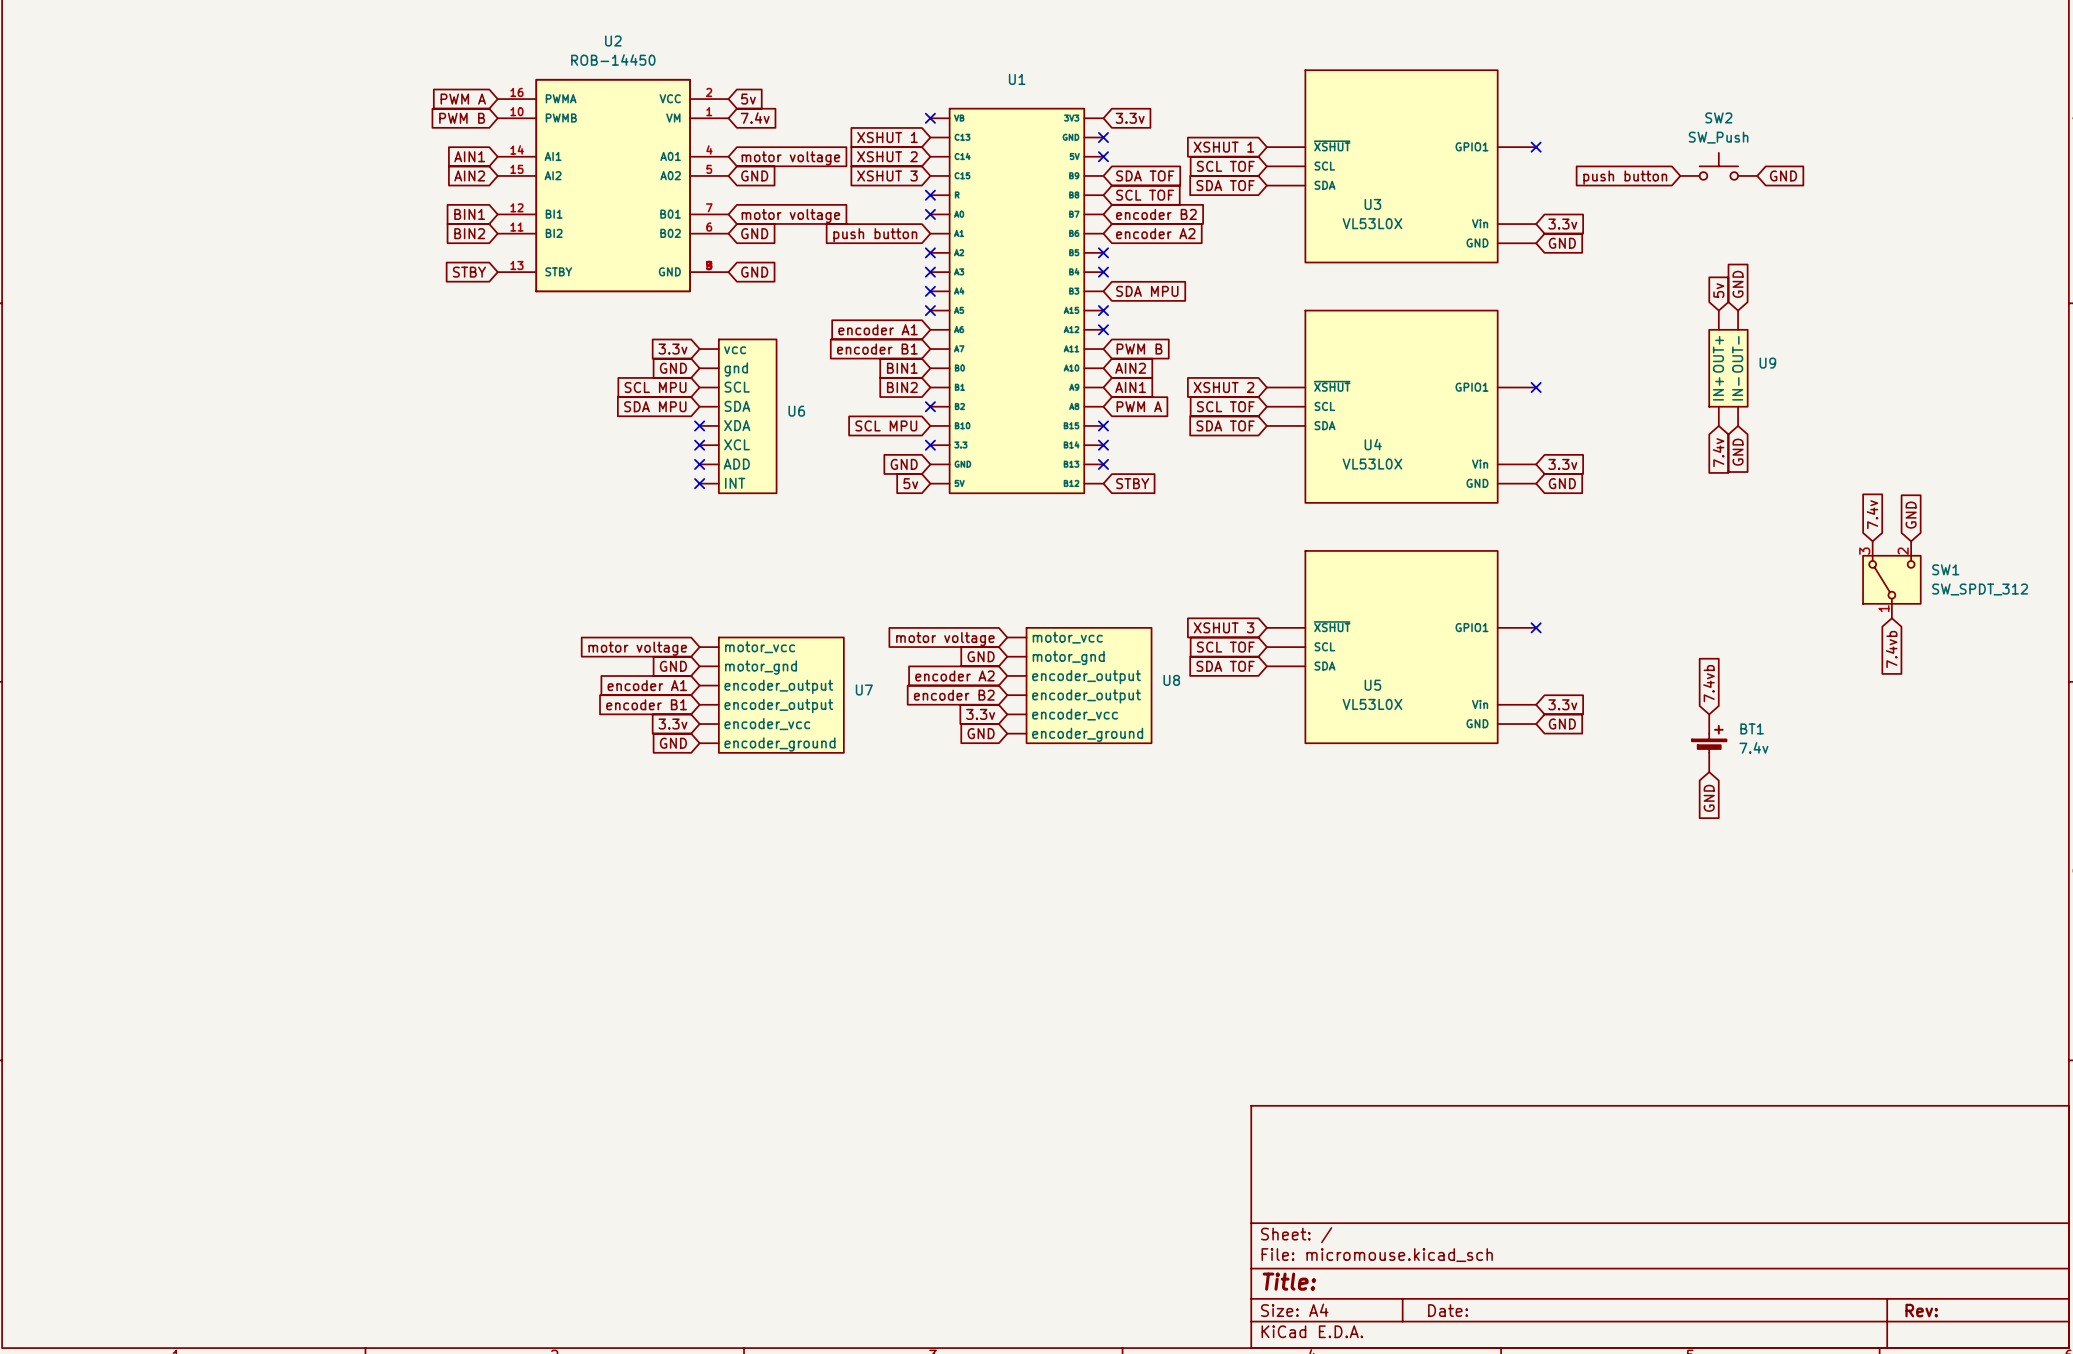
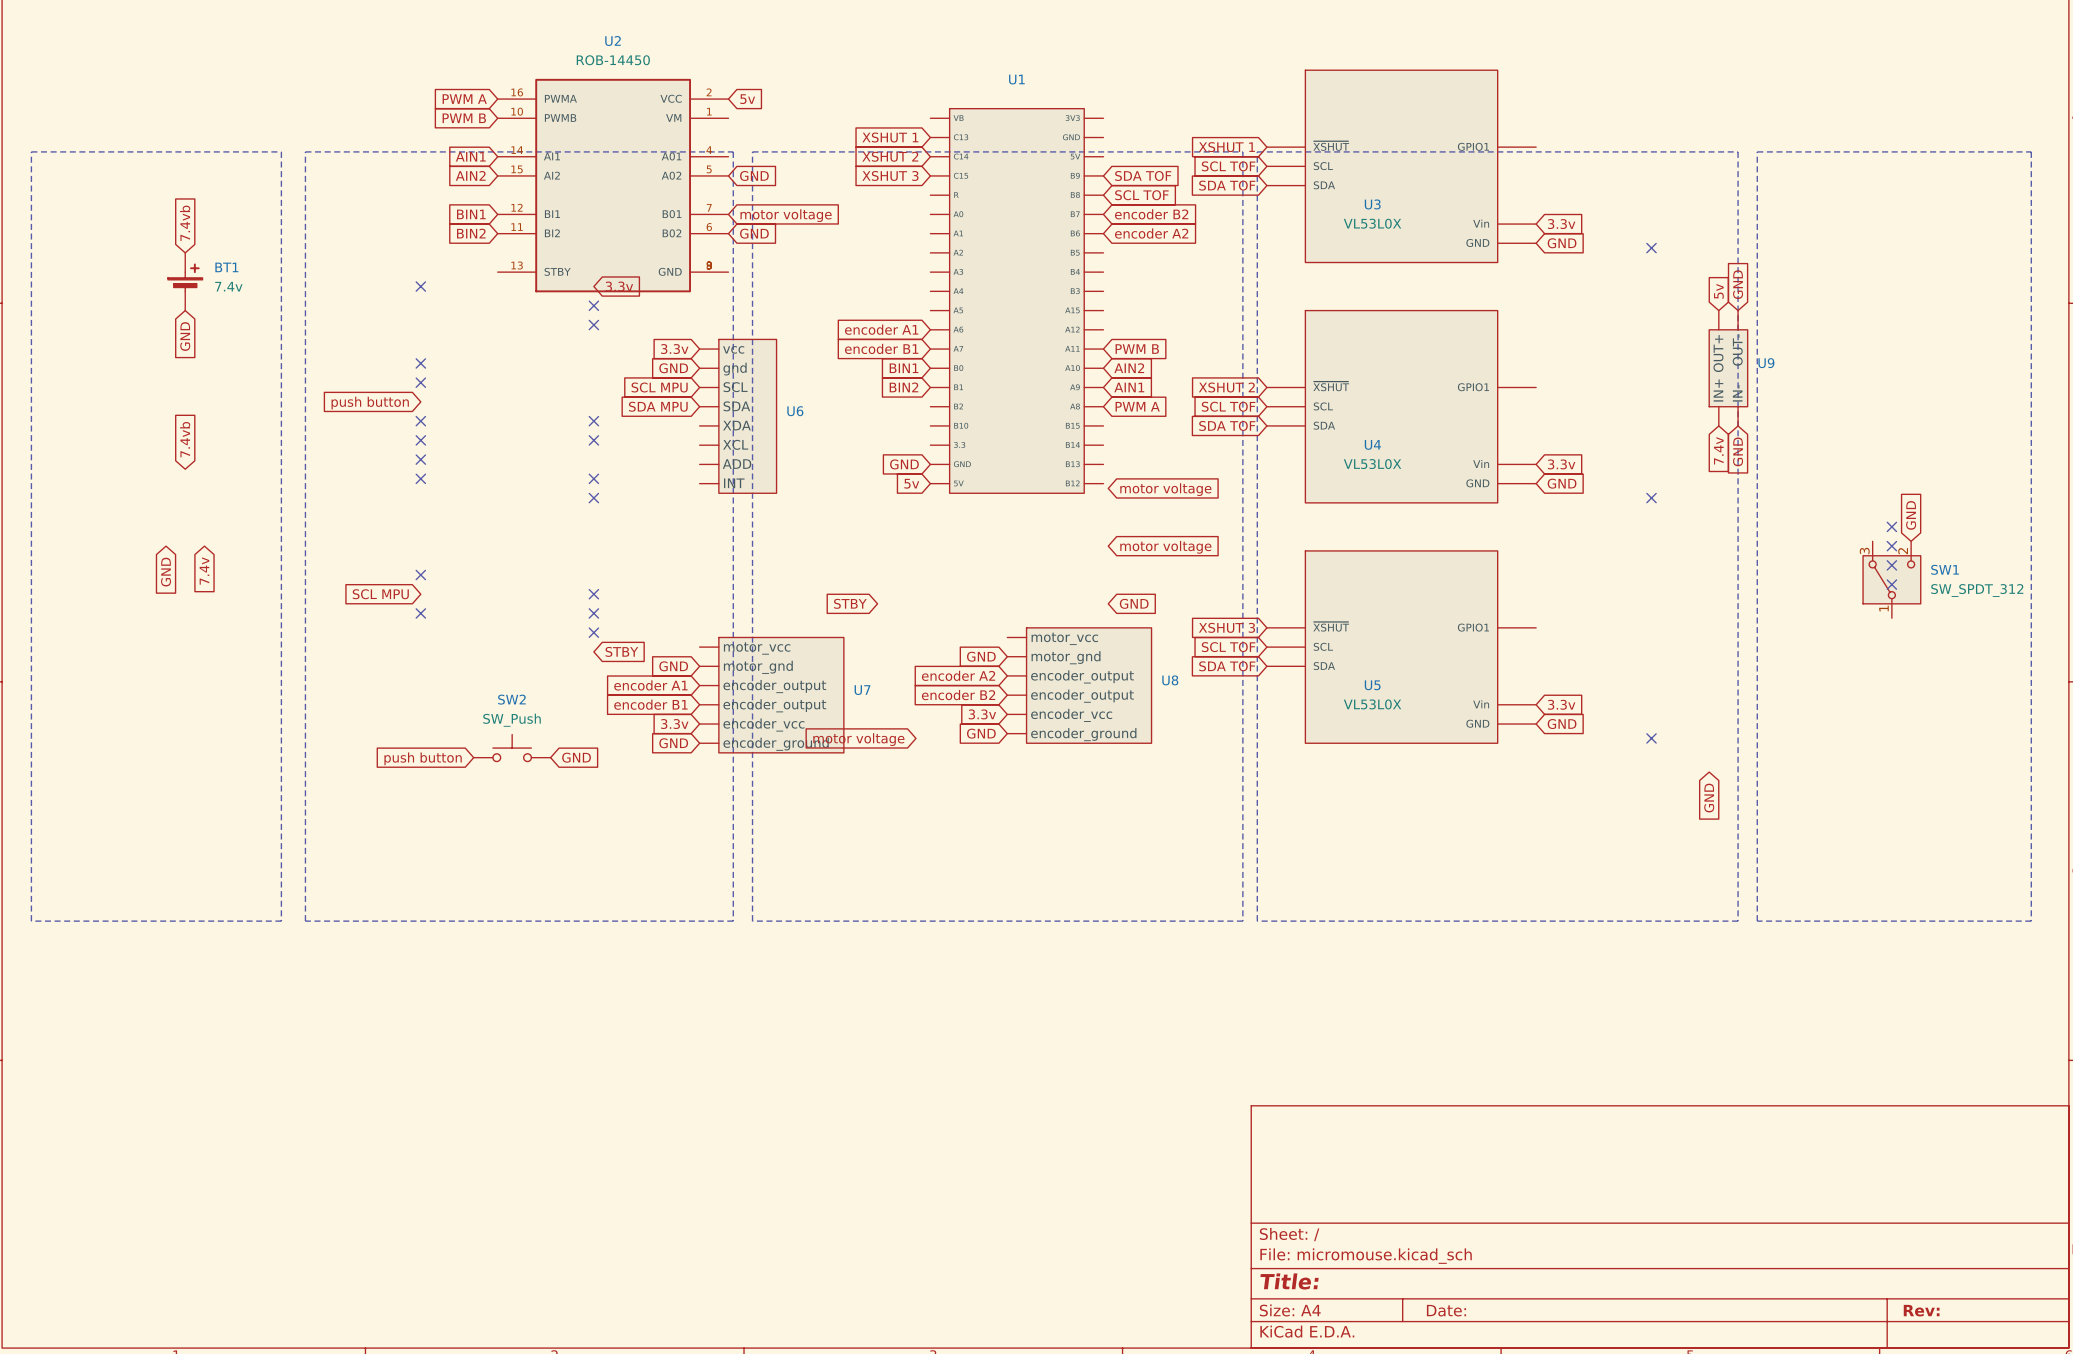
global label: 7.4v (755, 118) -> none
no-connect mark: (930, 118) -> none
global label: 3.3v (1130, 118) -> none
no-connect mark: (1103, 137) -> none
no-connect mark: (1536, 147) -> none
line: none -> (31, 151) (281, 151) (281, 921) (31, 921) (31, 151)
line: none -> (305, 151) (733, 151) (733, 921) (305, 921) (305, 151)
line: none -> (752, 151) (1242, 151) (1242, 921) (752, 921) (752, 151)
line: none -> (1257, 151) (1738, 151) (1738, 921) (1257, 921) (1257, 151)
line: none -> (1757, 151) (2031, 151) (2031, 921) (1757, 921) (1757, 151)
no-connect mark: (1103, 156) -> none
global label: motor voltage (790, 158) -> none
SW2 position: (1718, 166) -> (512, 748)
global label: GND (1783, 175) -> none
global label: push button (1625, 177) -> none
no-connect mark: (930, 195) -> none
no-connect mark: (930, 214) -> none
global label: none -> 7.4vb (185, 223)
global label: push button (875, 235) -> none
no-connect mark: none -> (1651, 248)
no-connect mark: (930, 252) -> none
no-connect mark: (1103, 252) -> none
global label: STBY (469, 272) -> none
global label: GND (754, 272) -> none
no-connect mark: (930, 272) -> none
no-connect mark: (1103, 272) -> none
no-connect mark: none -> (420, 286)
global label: none -> 3.3v (619, 286)
no-connect mark: (930, 291) -> none
global label: SDA MPU (1147, 291) -> none
no-connect mark: none -> (593, 305)
no-connect mark: (930, 310) -> none
no-connect mark: (1103, 310) -> none
no-connect mark: none -> (593, 325)
no-connect mark: (1103, 329) -> none
global label: none -> GND (185, 336)
no-connect mark: none -> (420, 363)
no-connect mark: none -> (420, 382)
no-connect mark: (1536, 387) -> none
global label: none -> push button (370, 403)
no-connect mark: (930, 406) -> none
no-connect mark: none -> (420, 421)
no-connect mark: none -> (593, 421)
no-connect mark: (699, 425) -> none
global label: SCL MPU (886, 425) -> none
no-connect mark: (1103, 425) -> none
global label: none -> 7.4vb (185, 439)
no-connect mark: none -> (420, 440)
no-connect mark: none -> (593, 440)
no-connect mark: (699, 445) -> none
no-connect mark: (930, 445) -> none
no-connect mark: (1103, 445) -> none
no-connect mark: none -> (420, 459)
no-connect mark: (699, 464) -> none
no-connect mark: (1103, 464) -> none
no-connect mark: none -> (420, 478)
no-connect mark: none -> (593, 478)
no-connect mark: (699, 483) -> none
global label: STBY (1132, 483) -> motor voltage (1165, 489)
no-connect mark: none -> (593, 498)
no-connect mark: none -> (1651, 498)
global label: 7.4v (1872, 514) -> none
no-connect mark: none -> (1891, 526)
no-connect mark: none -> (1891, 546)
global label: none -> motor voltage (1165, 547)
no-connect mark: none -> (1891, 565)
global label: none -> GND (166, 572)
global label: none -> 7.4v (204, 571)
no-connect mark: none -> (420, 574)
no-connect mark: none -> (1891, 584)
global label: none -> SCL MPU (380, 594)
no-connect mark: none -> (593, 594)
global label: none -> STBY (850, 603)
global label: none -> GND (1134, 603)
no-connect mark: none -> (420, 613)
no-connect mark: none -> (593, 613)
no-connect mark: (1536, 627) -> none
no-connect mark: none -> (593, 632)
global label: motor voltage (945, 639) -> none
global label: motor voltage (637, 648) -> none
global label: 7.4vb (1891, 649) -> none
global label: none -> STBY (621, 651)
global label: 7.4vb (1708, 683) -> none
no-connect mark: none -> (1651, 738)
global label: none -> motor voltage (858, 739)
BT1 position: (1709, 743) -> (185, 281)
global label: none -> GND (576, 757)
global label: none -> push button (423, 758)

